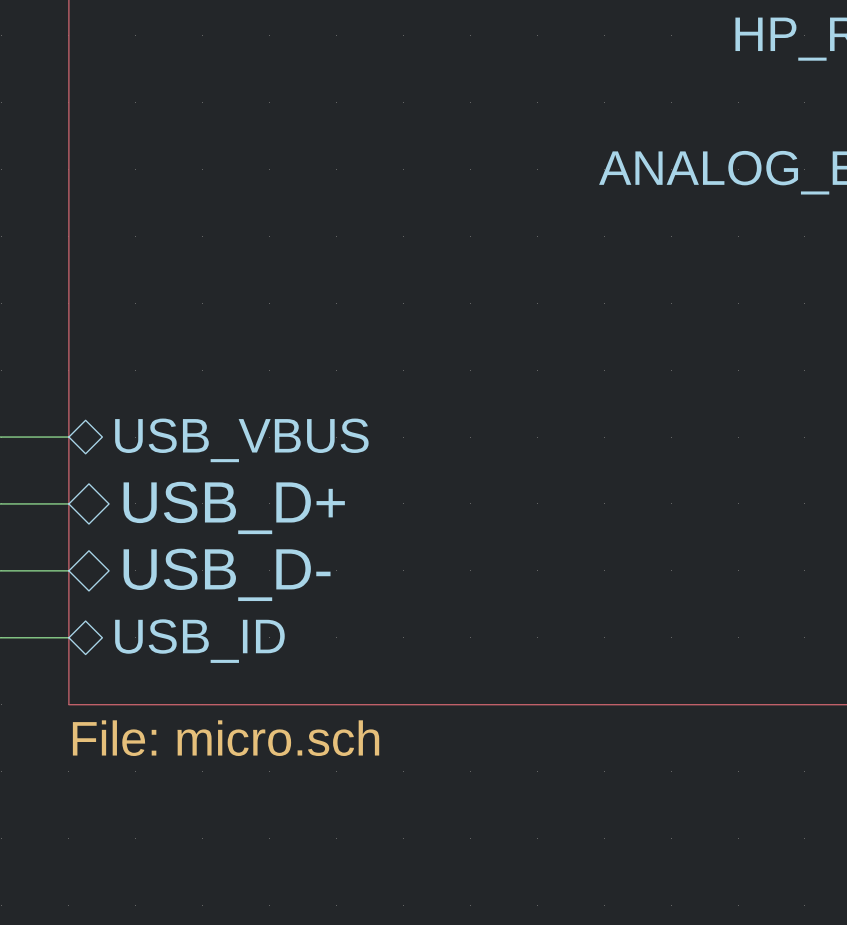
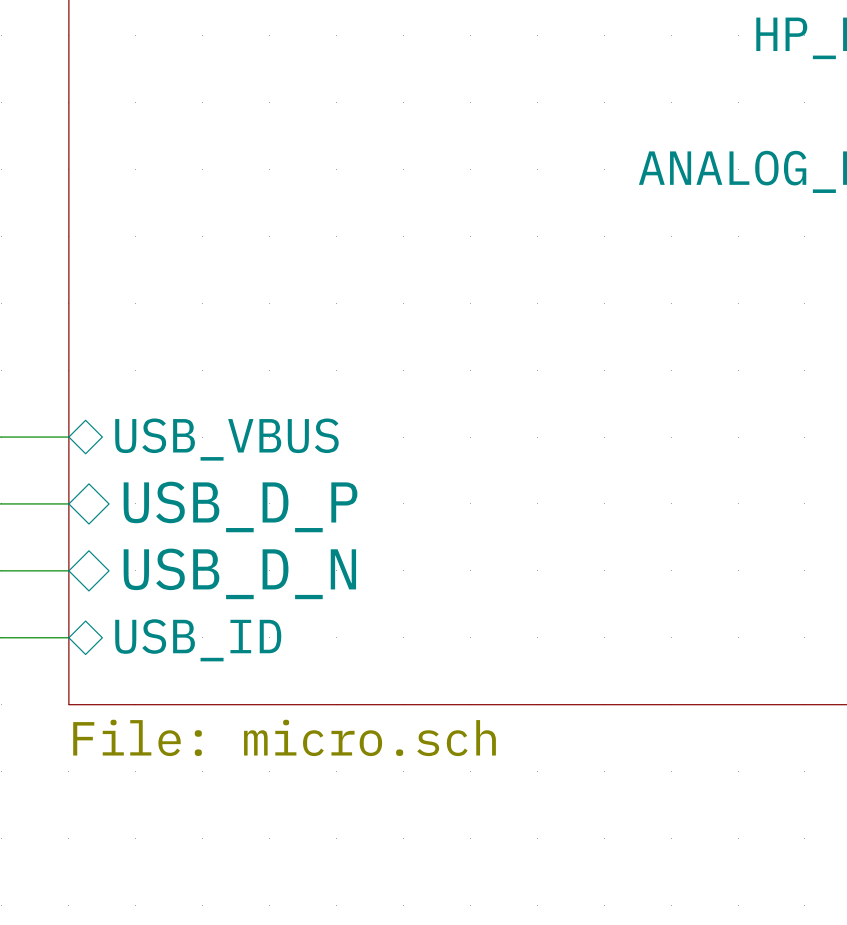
sheet pin: USB_D+ (234, 507) -> USB_D_P (240, 506)
sheet pin: USB_D- (227, 574) -> USB_D_N (239, 573)

